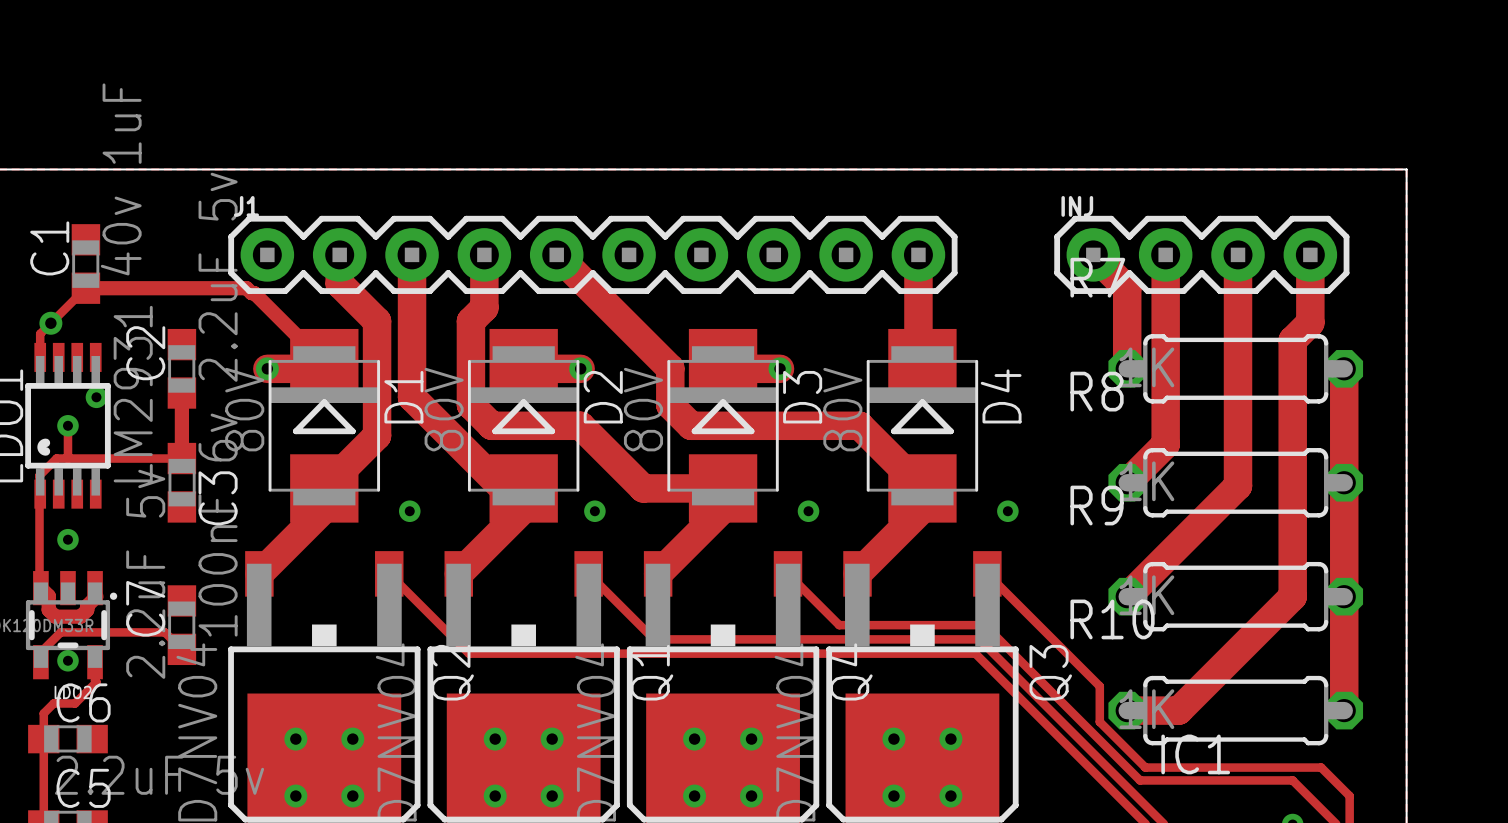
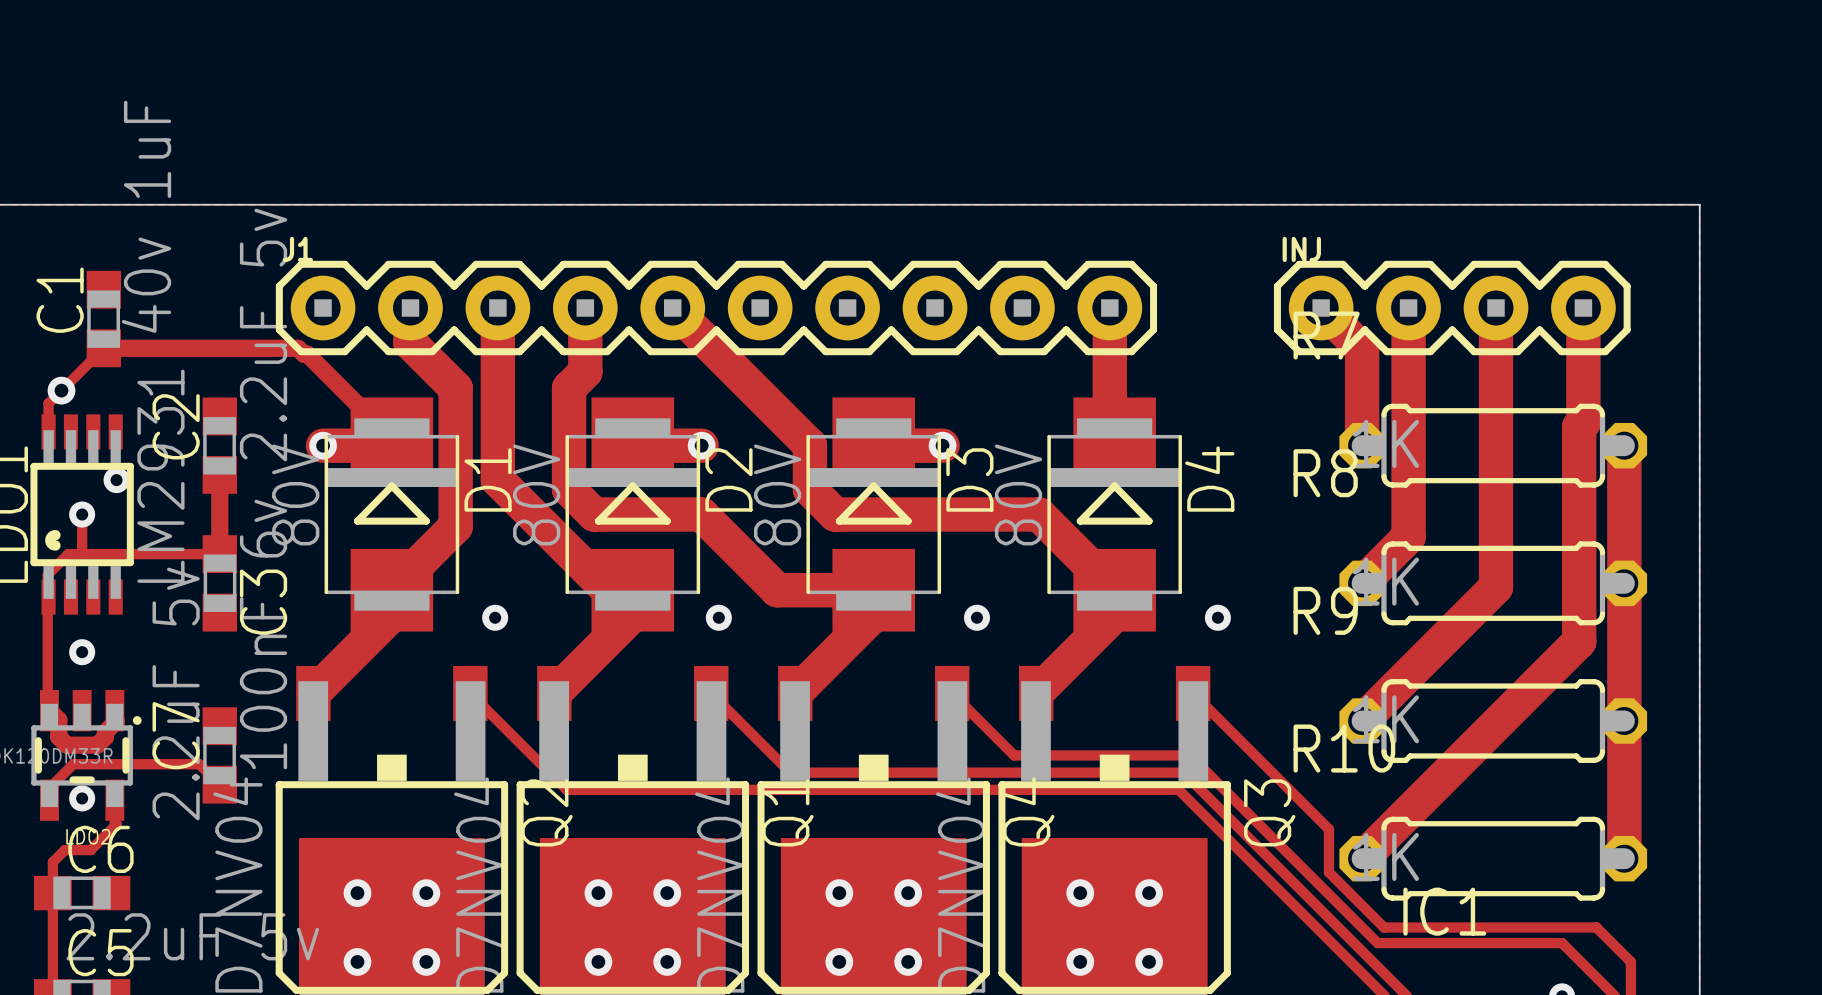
track: (1310, 322) (1292, 340) (1292, 596) (1178, 710) (1127, 710) -> (1583, 389) (1583, 422) (1579, 426) (1579, 641) (1362, 858)

